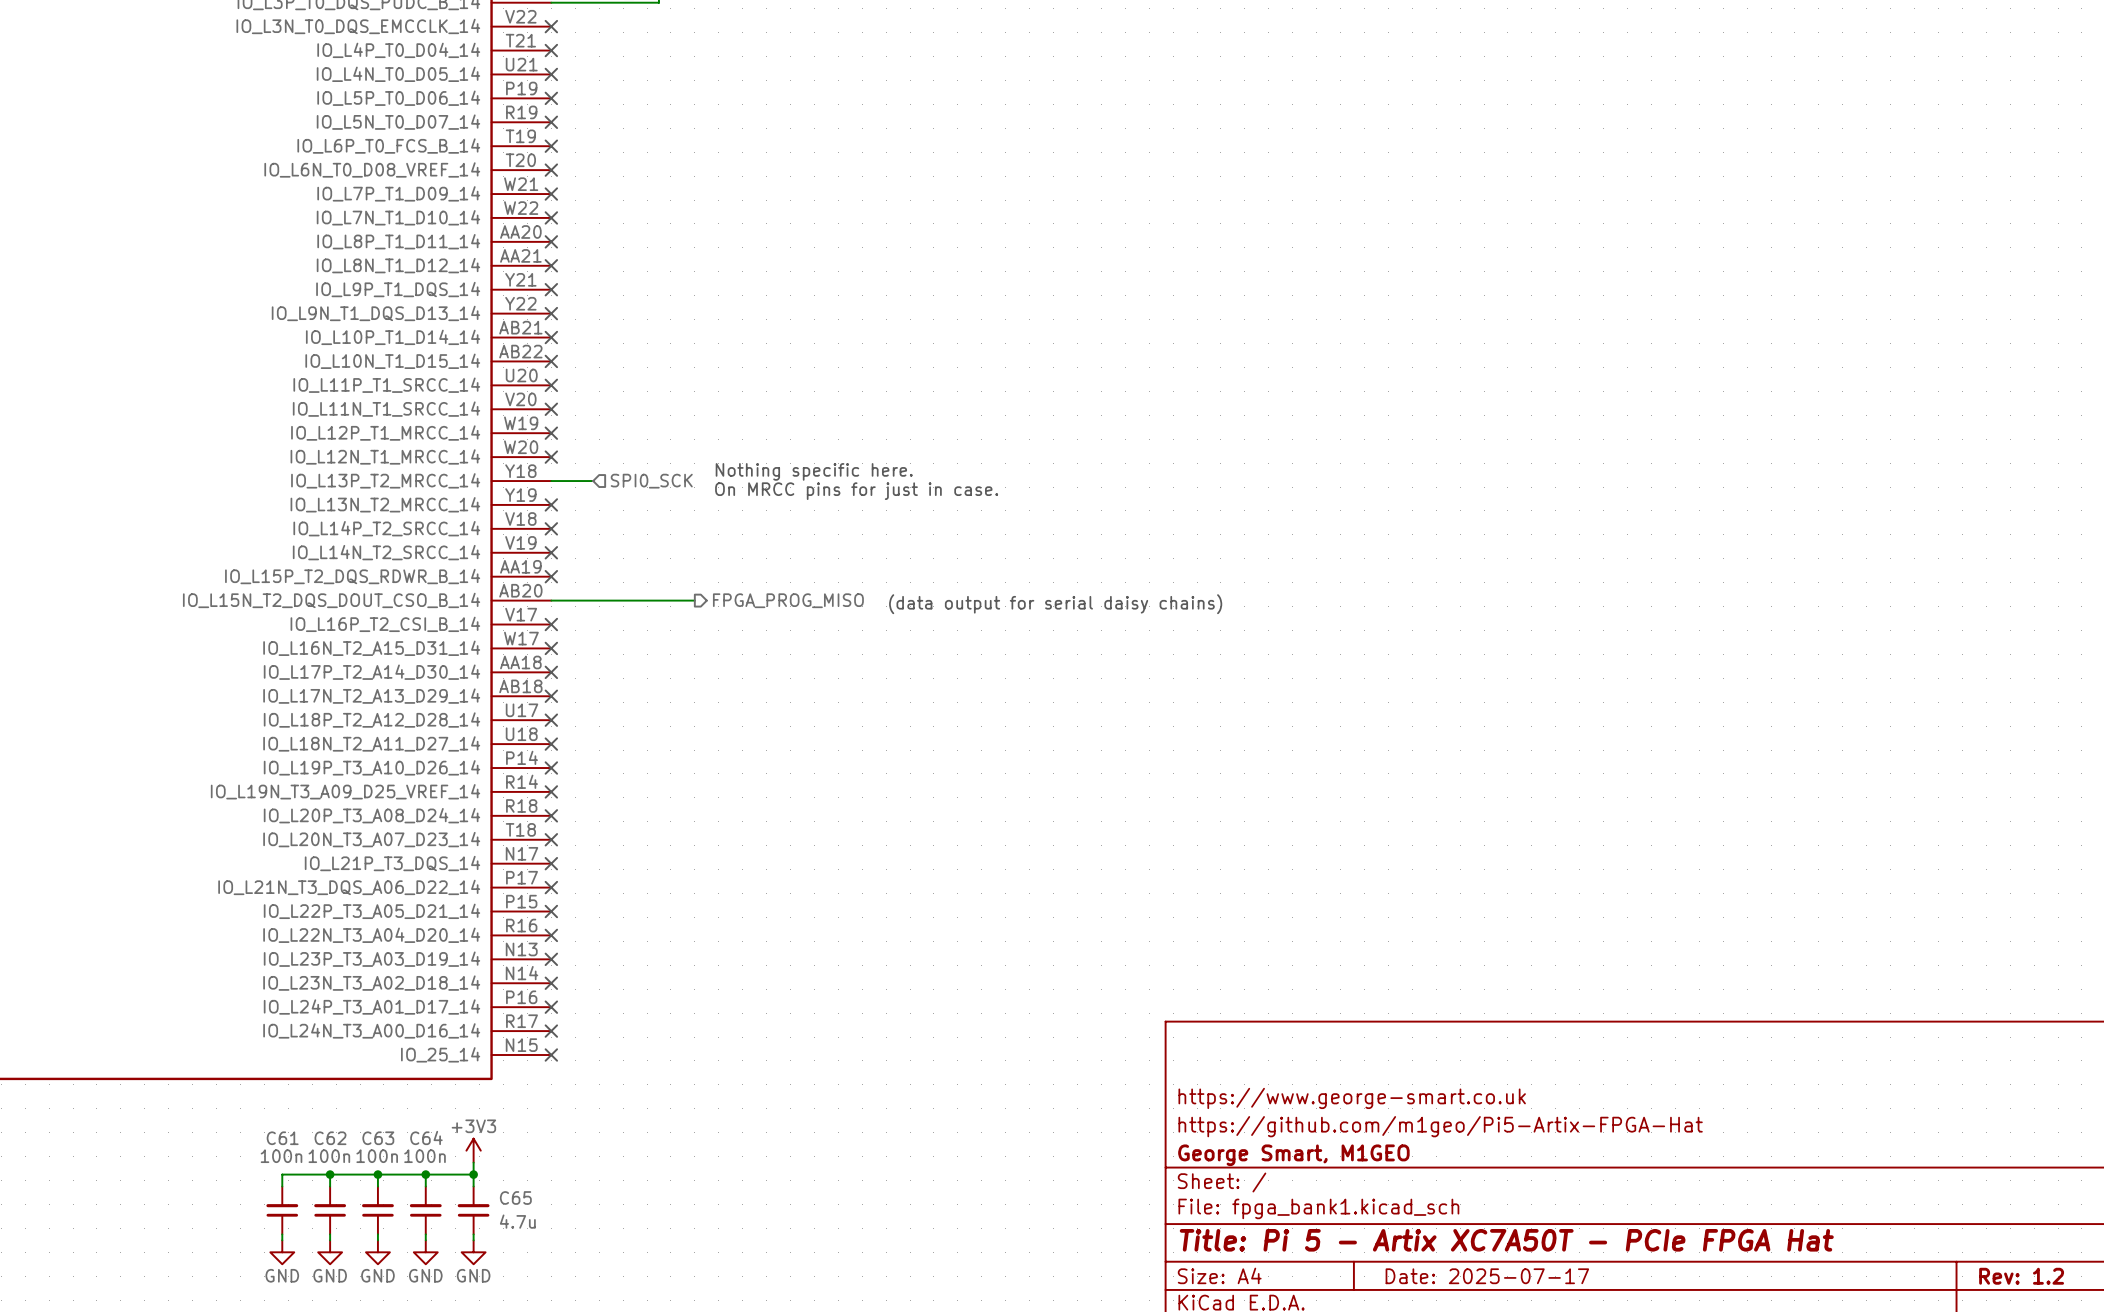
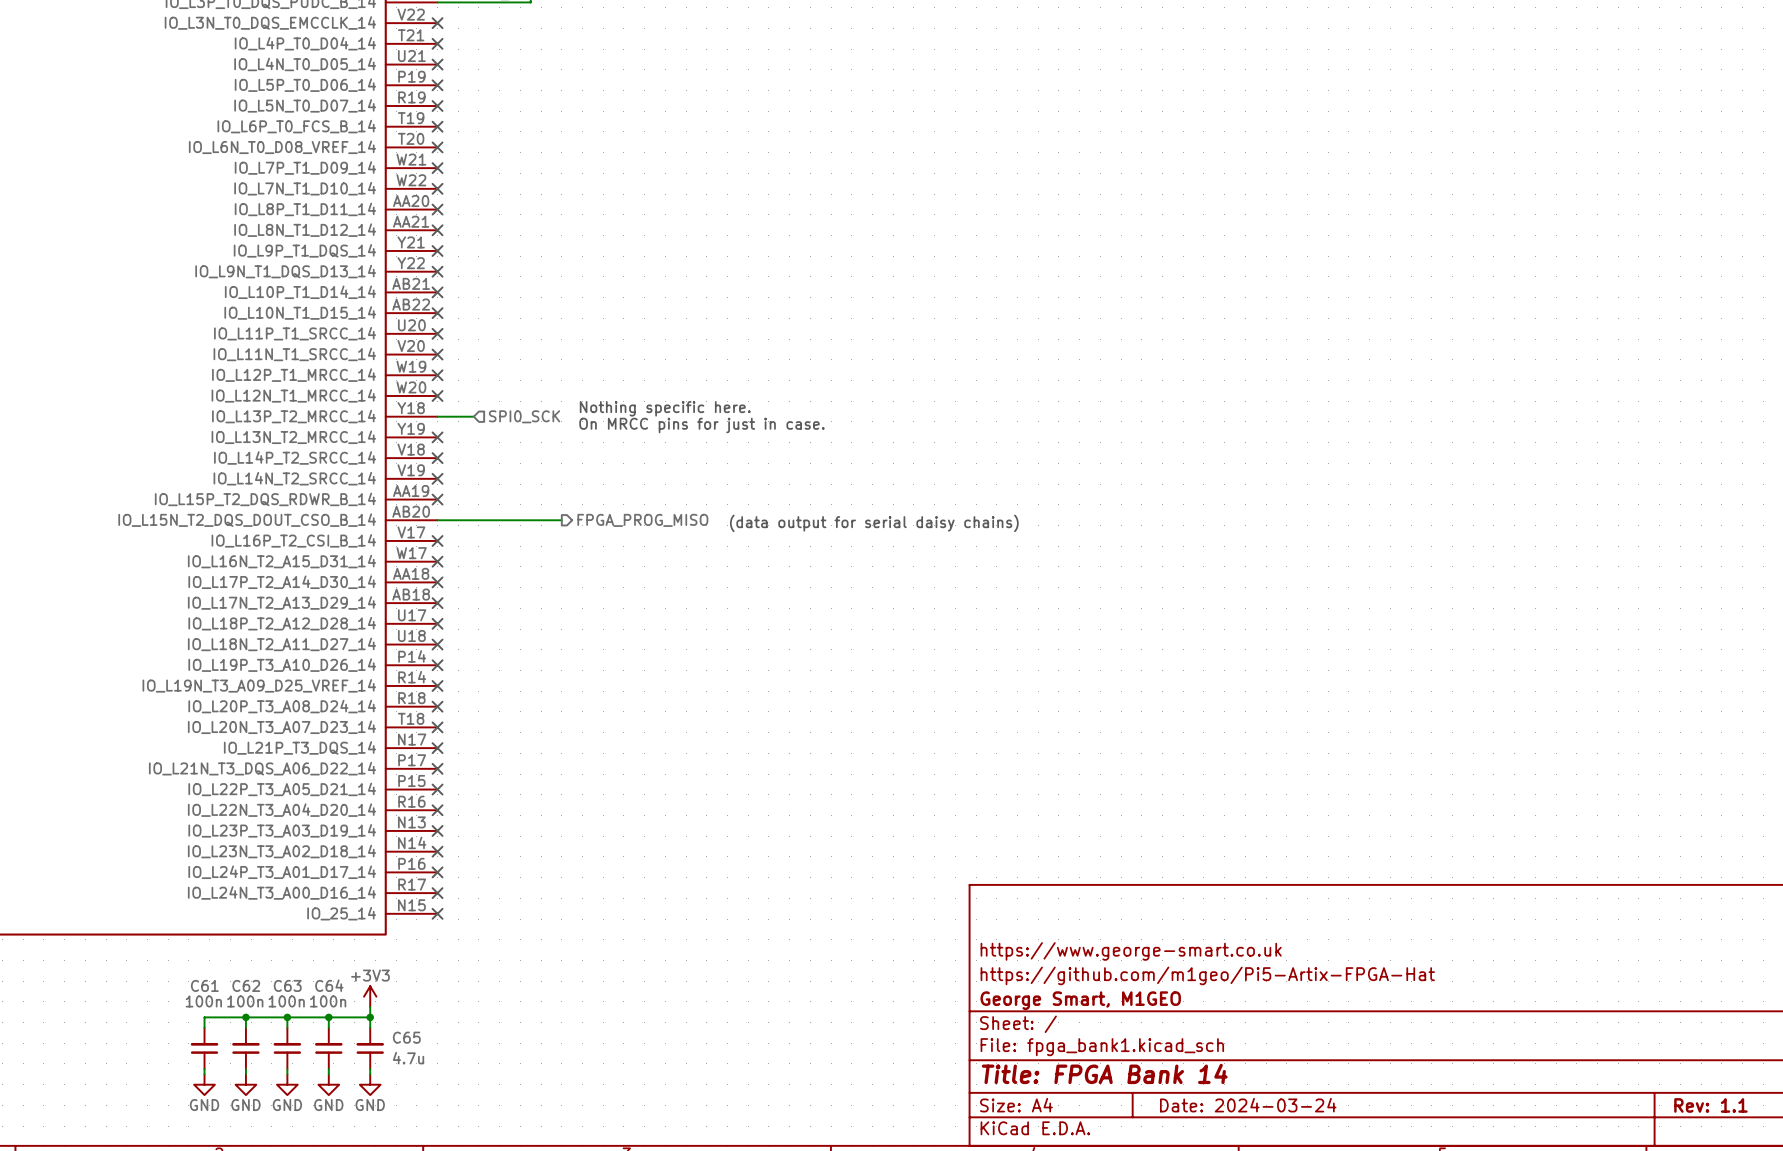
title block: Title: Pi 5 - Artix XC7A50T - PCIe FPGA Hat (1506, 1240) -> Title: FPGA Bank 14 (1104, 1073)
title block: Date: 2025-07-17 (1487, 1276) -> Date: 2024-03-24 (1248, 1105)
title block: Rev: 1.2 (2021, 1276) -> Rev: 1.1 (1710, 1105)

